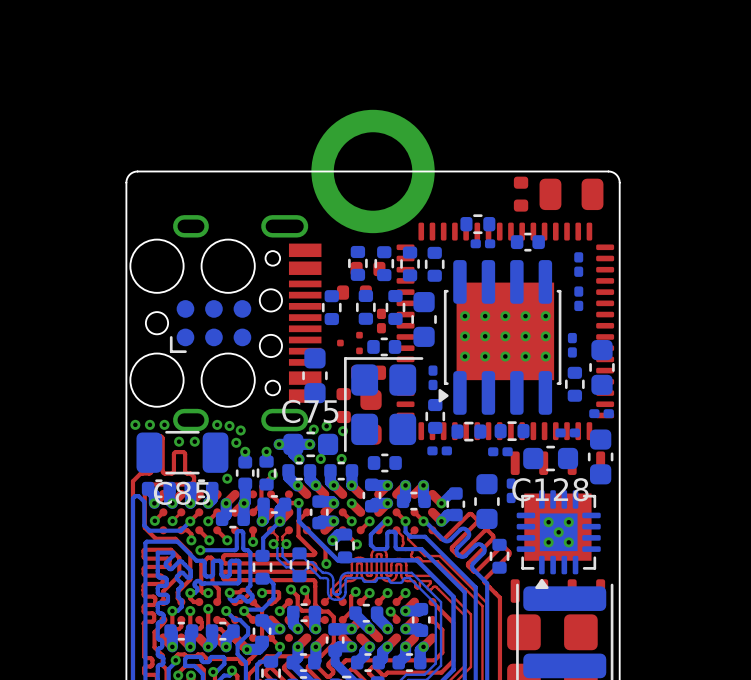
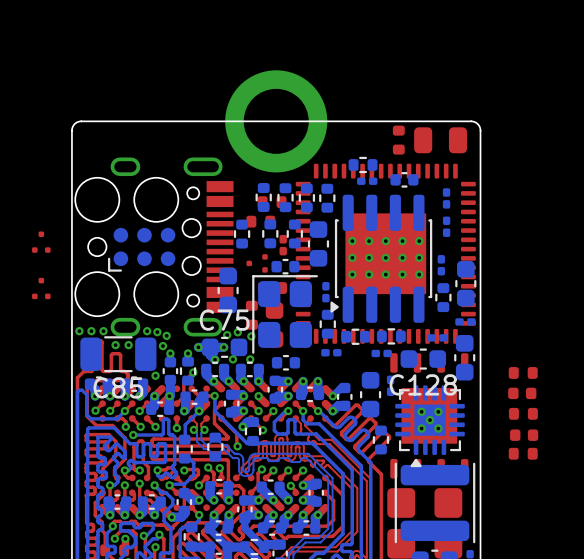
part: none -> (41, 242)
part: none -> (41, 288)
part: none -> (523, 372)
part: none -> (522, 393)
part: none -> (523, 413)
part: none -> (524, 435)
part: none -> (523, 453)

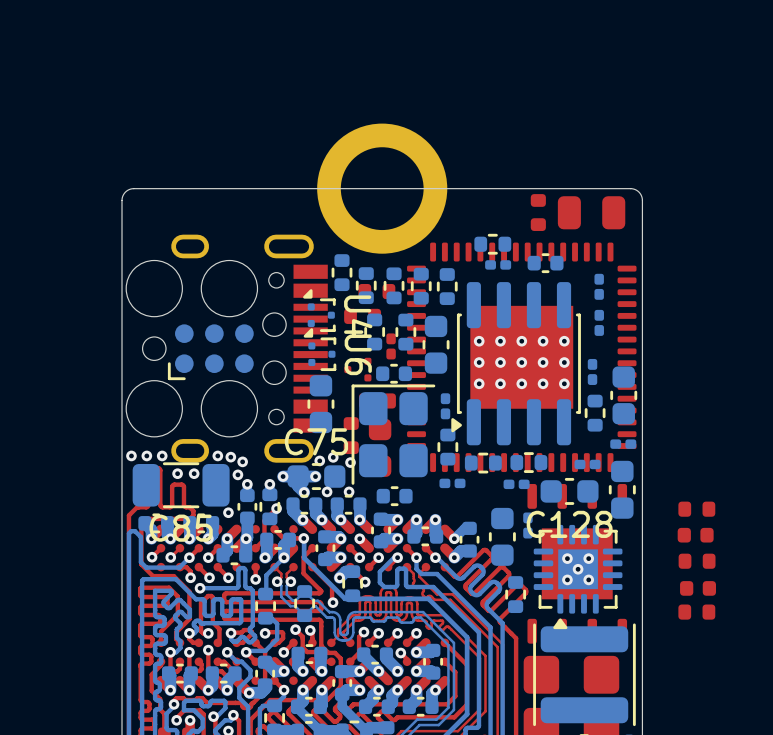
part position: (242, 234) -> (342, 272)
U4 side: top (41, 242) -> bottom (319, 310)
U6 side: top (41, 288) -> bottom (320, 349)

